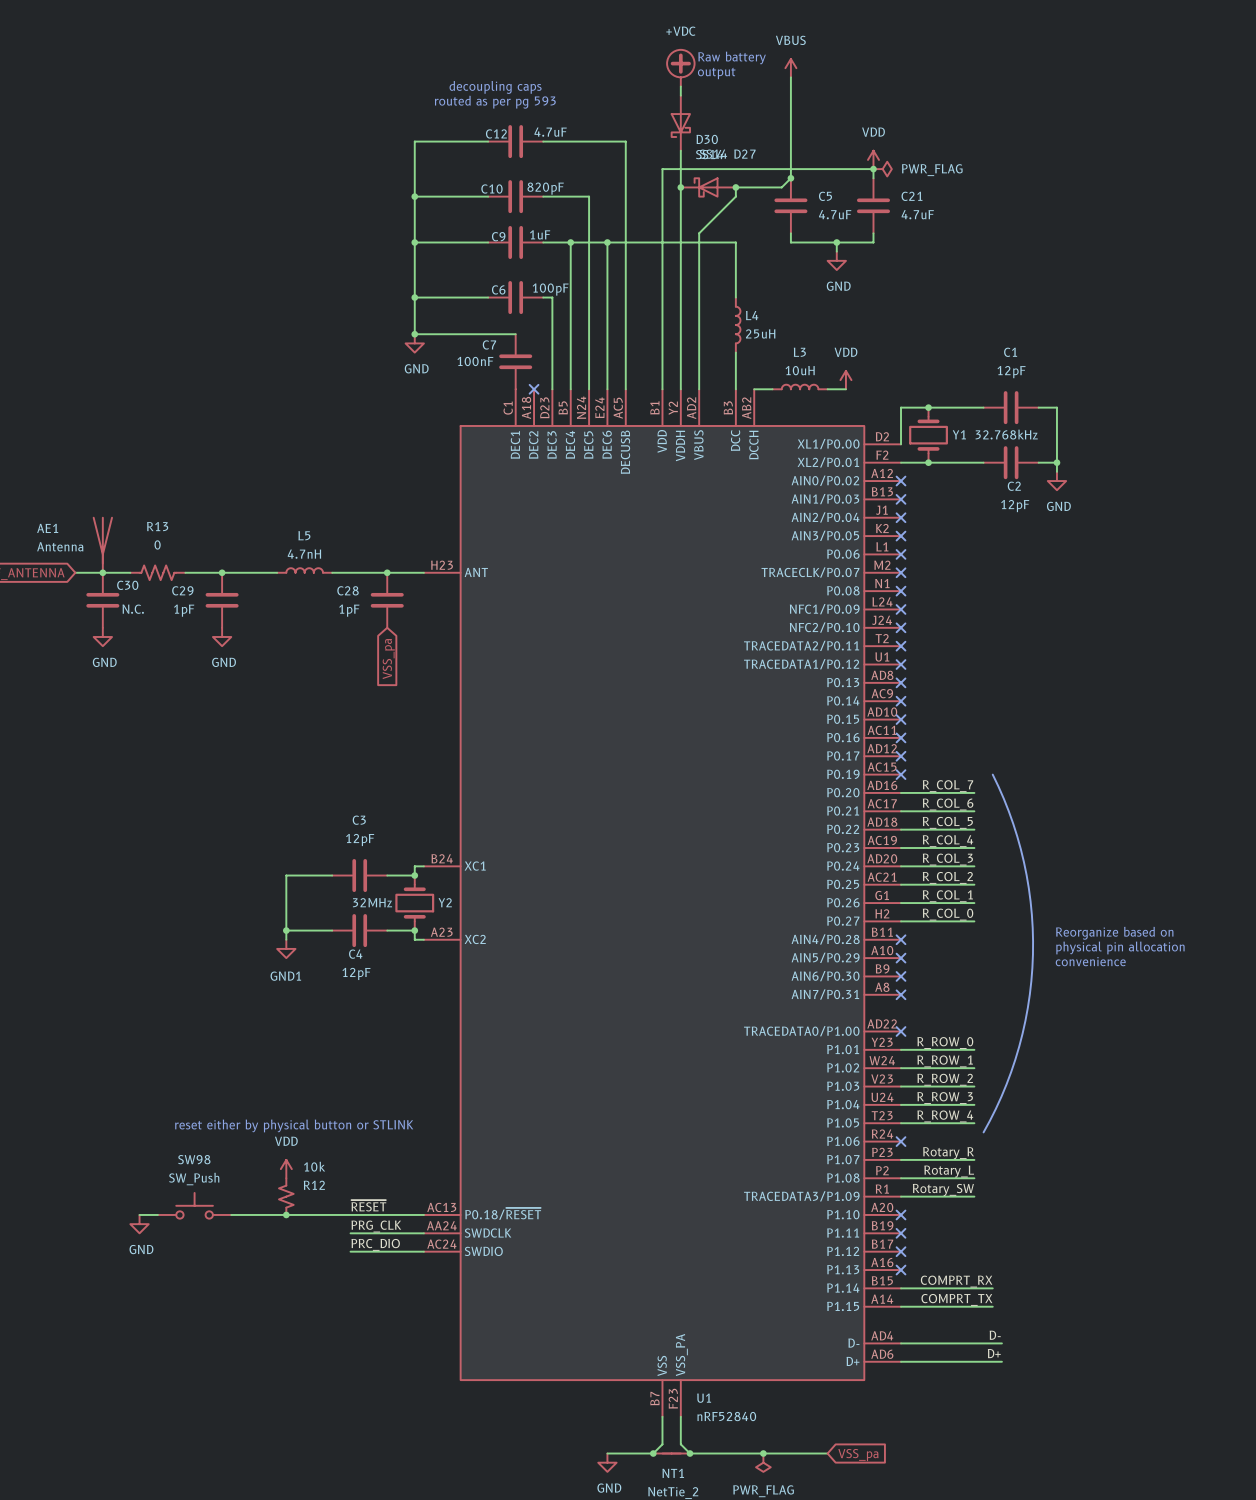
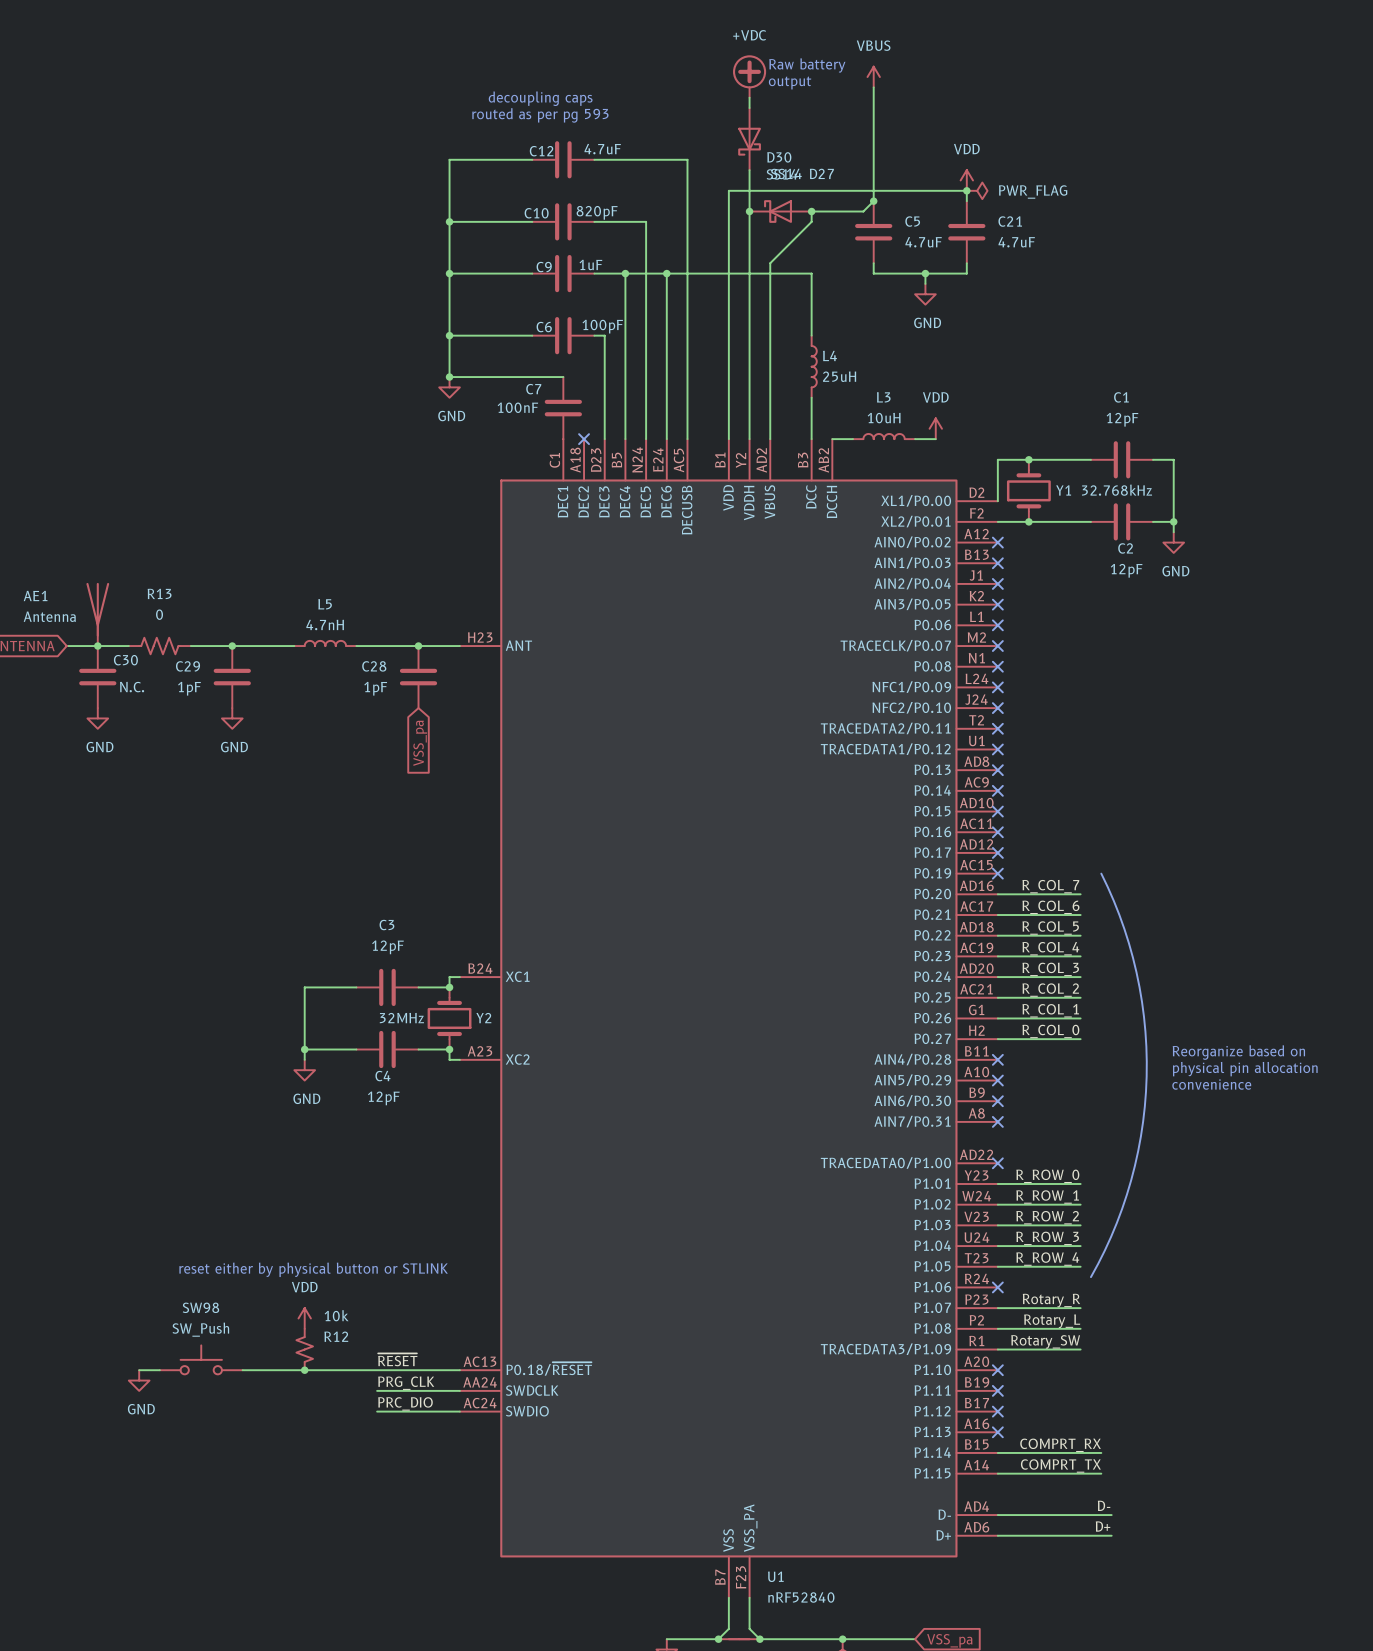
power symbol: GND1 (286, 948) -> GND (304, 1070)

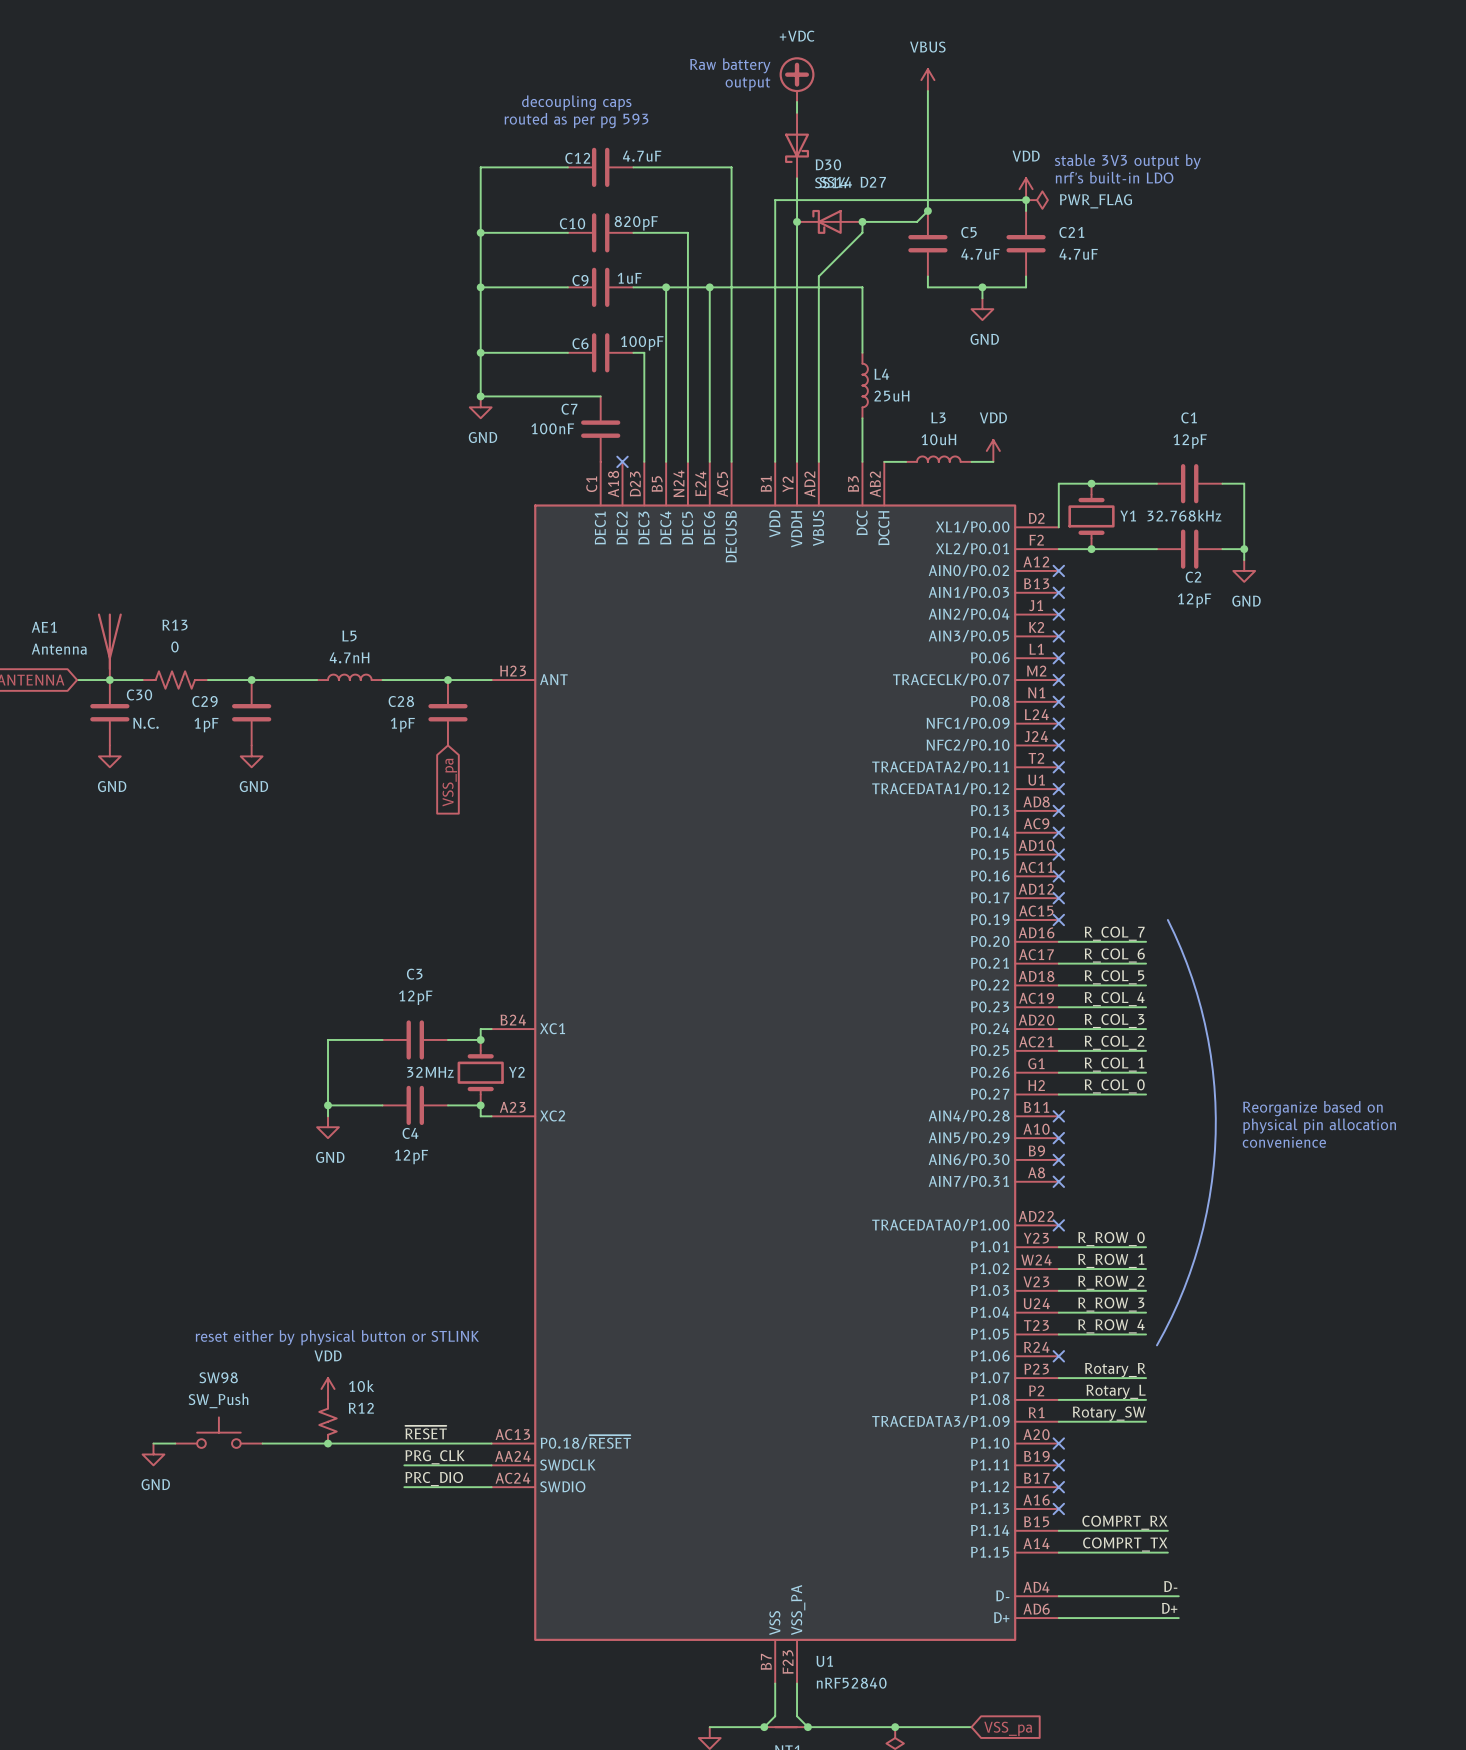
text position: Raw battery (807, 65) -> Raw battery (730, 65)
text position: output (790, 82) -> output (747, 84)
text: none -> stable 3V3 output by (1127, 161)
text: none -> nrf's built-in LDO (1114, 177)

